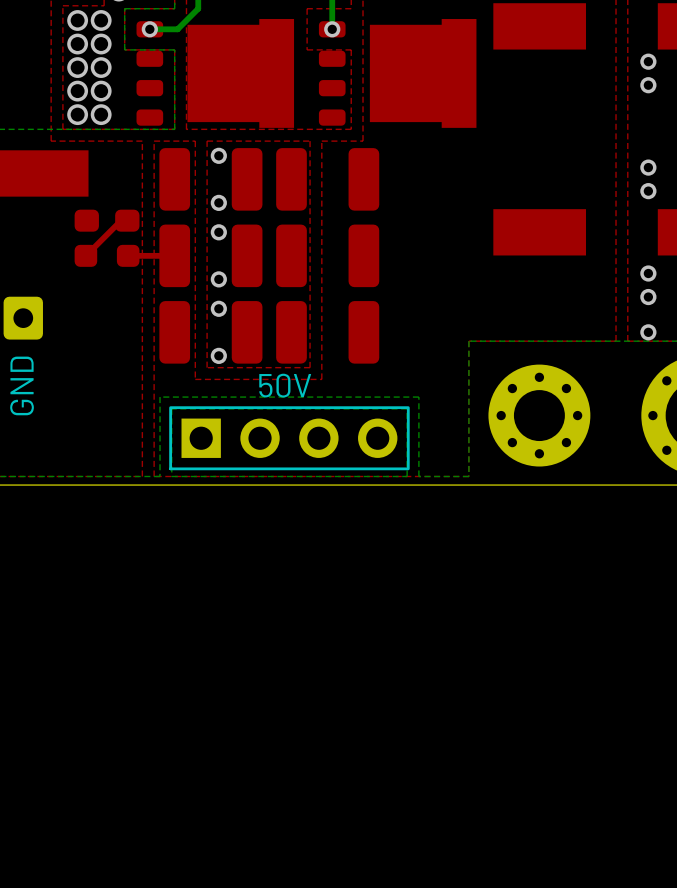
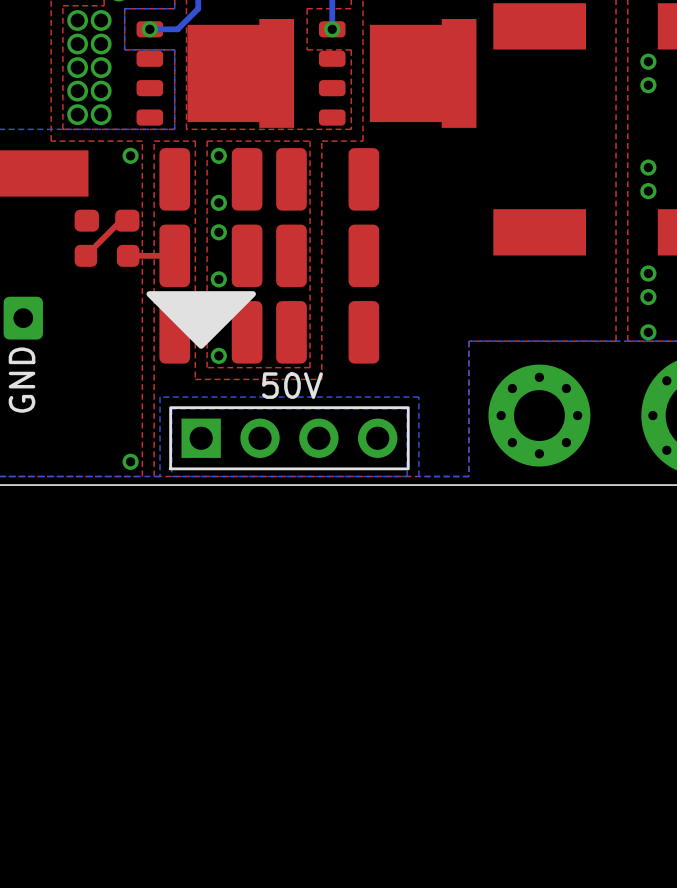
via: none -> (130, 155)
drawing: none -> [146, 291, 256, 349]
via: (218, 308) -> none
via: none -> (130, 461)

